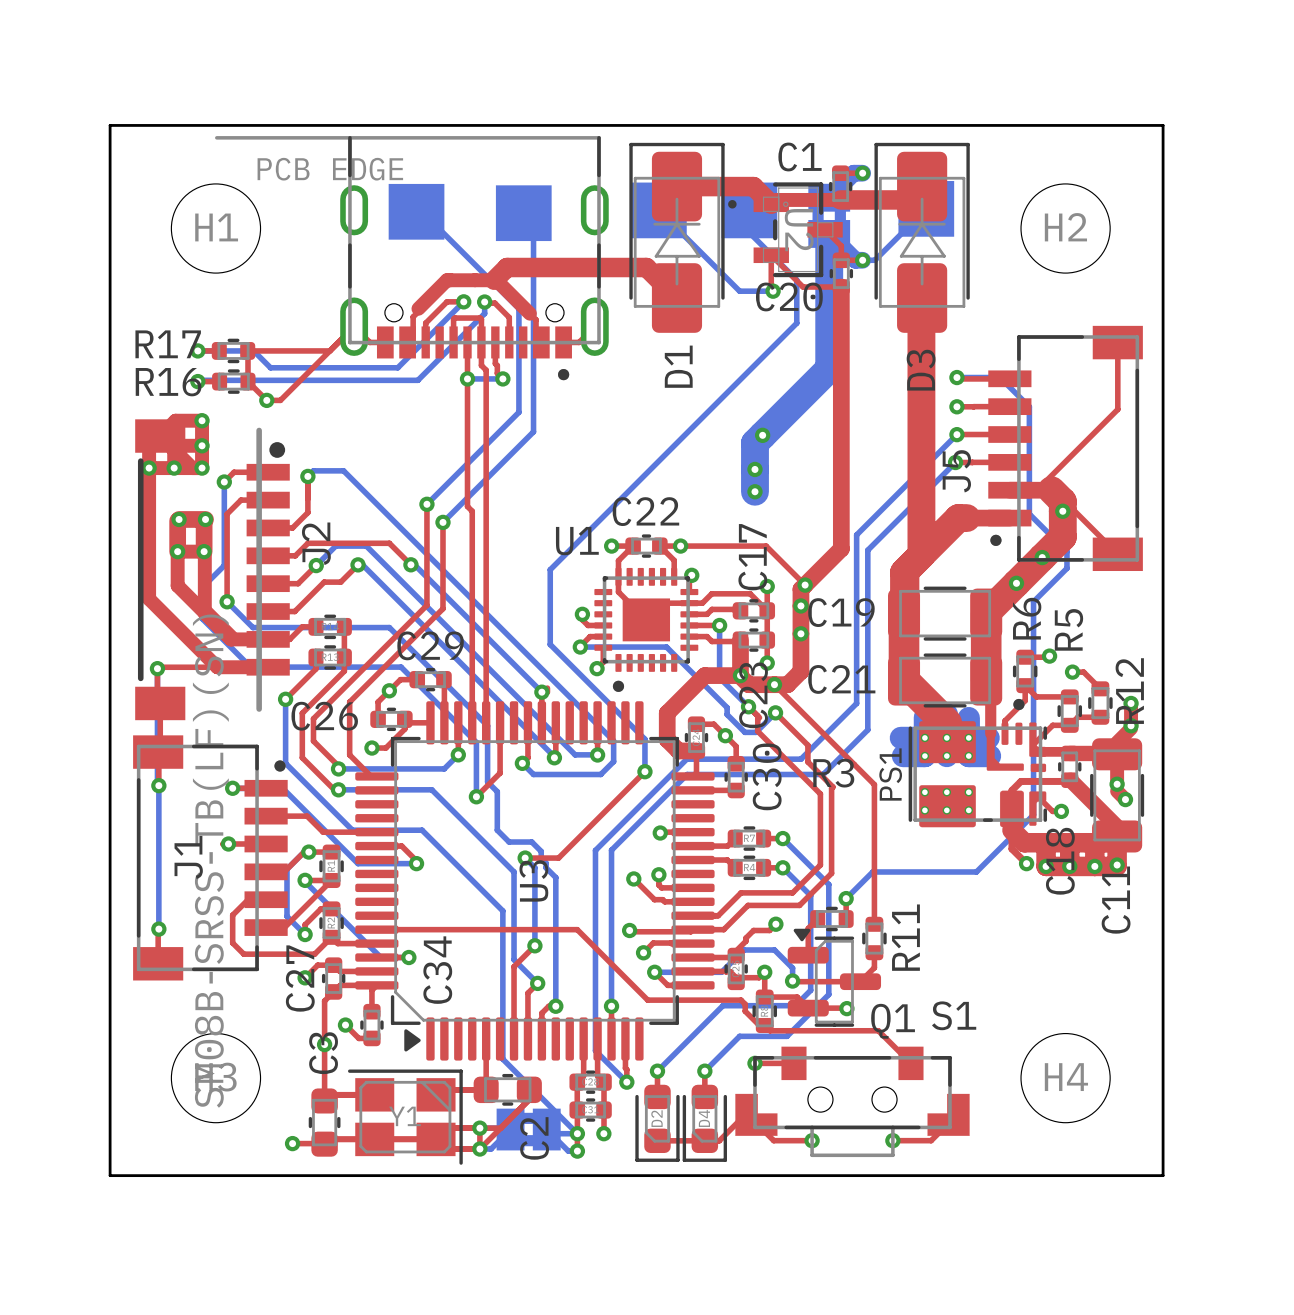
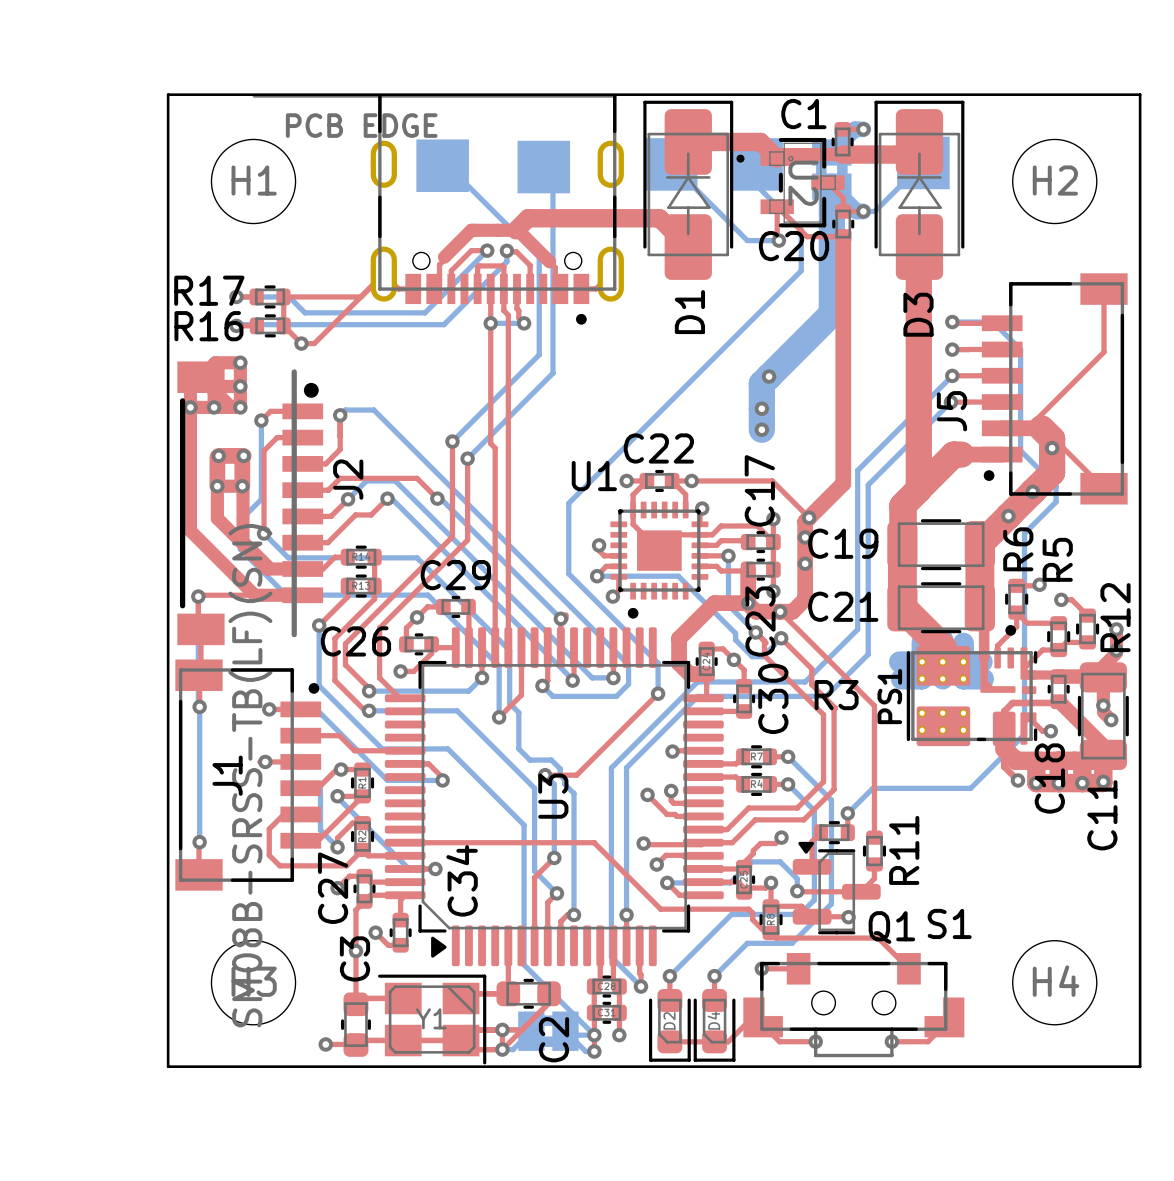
board edge: (110, 125) (1163, 125) (1163, 1175) (110, 1175) (110, 125) -> (168, 94) (168, 1066) (1140, 1066) (1140, 94) (168, 94)

